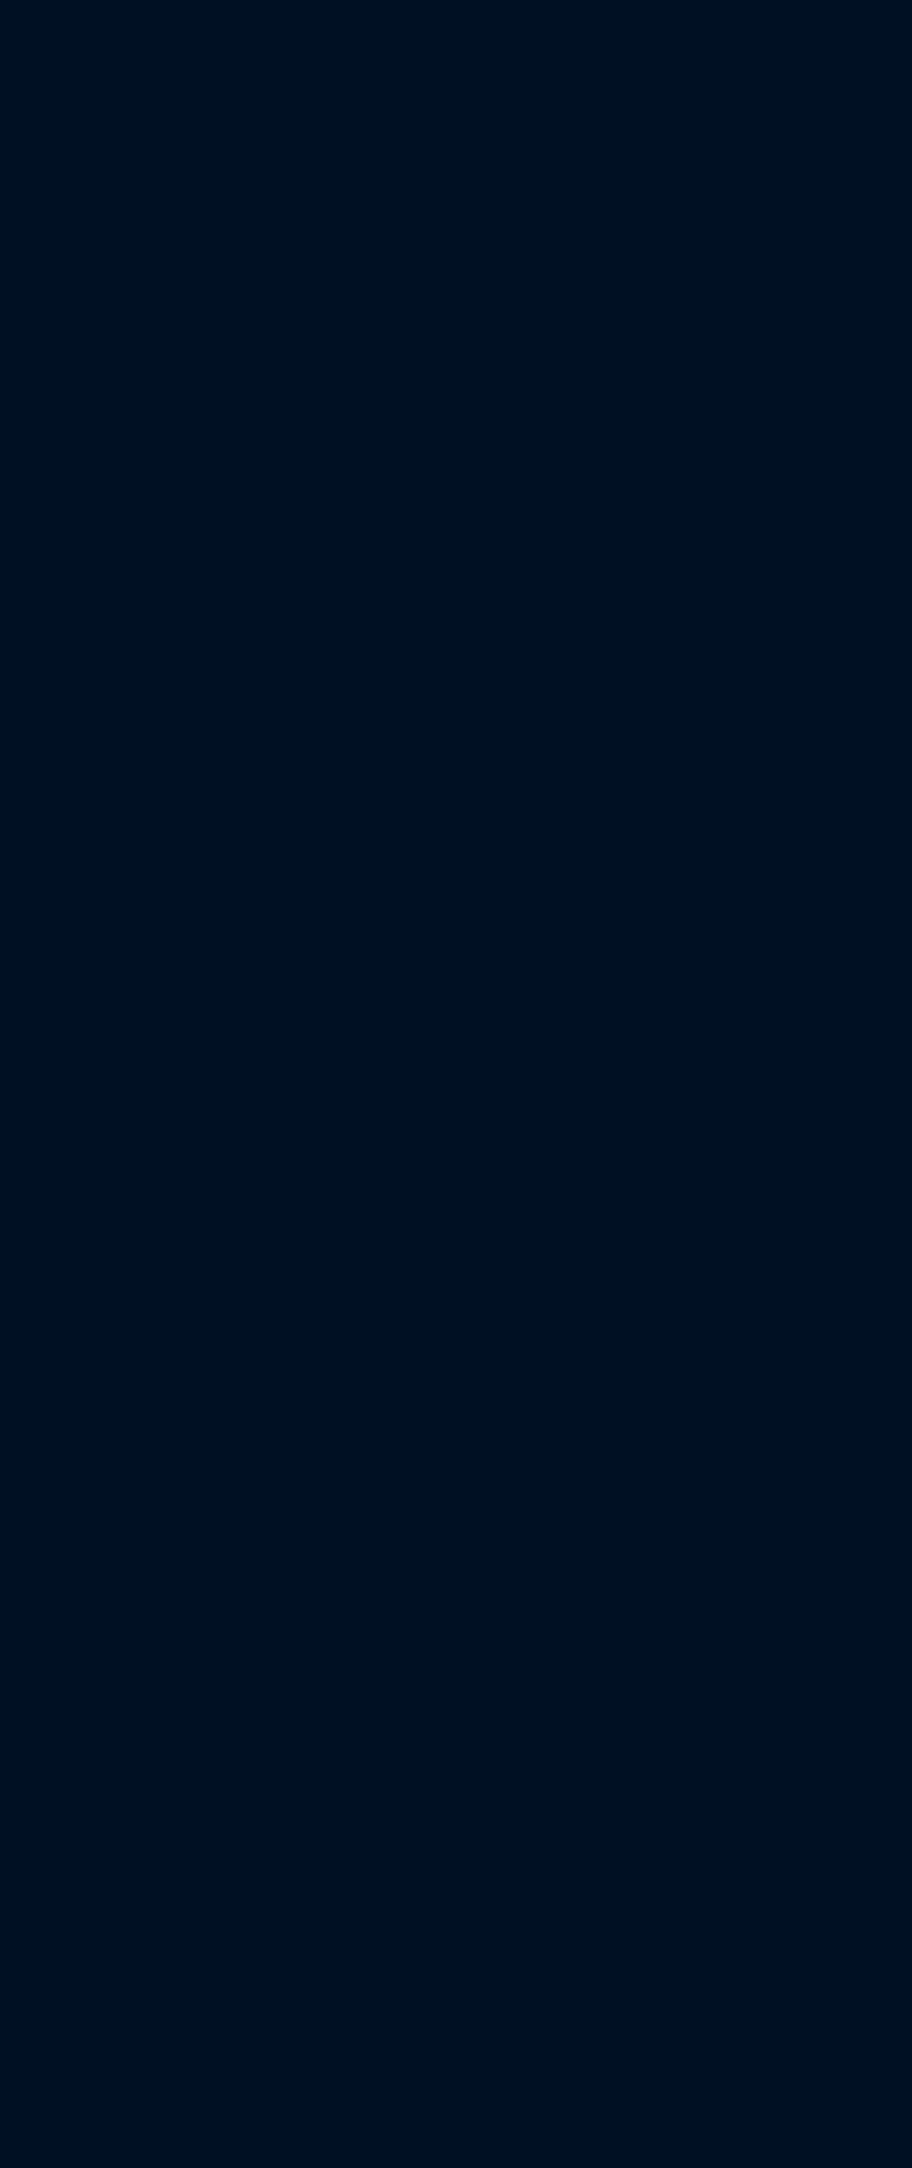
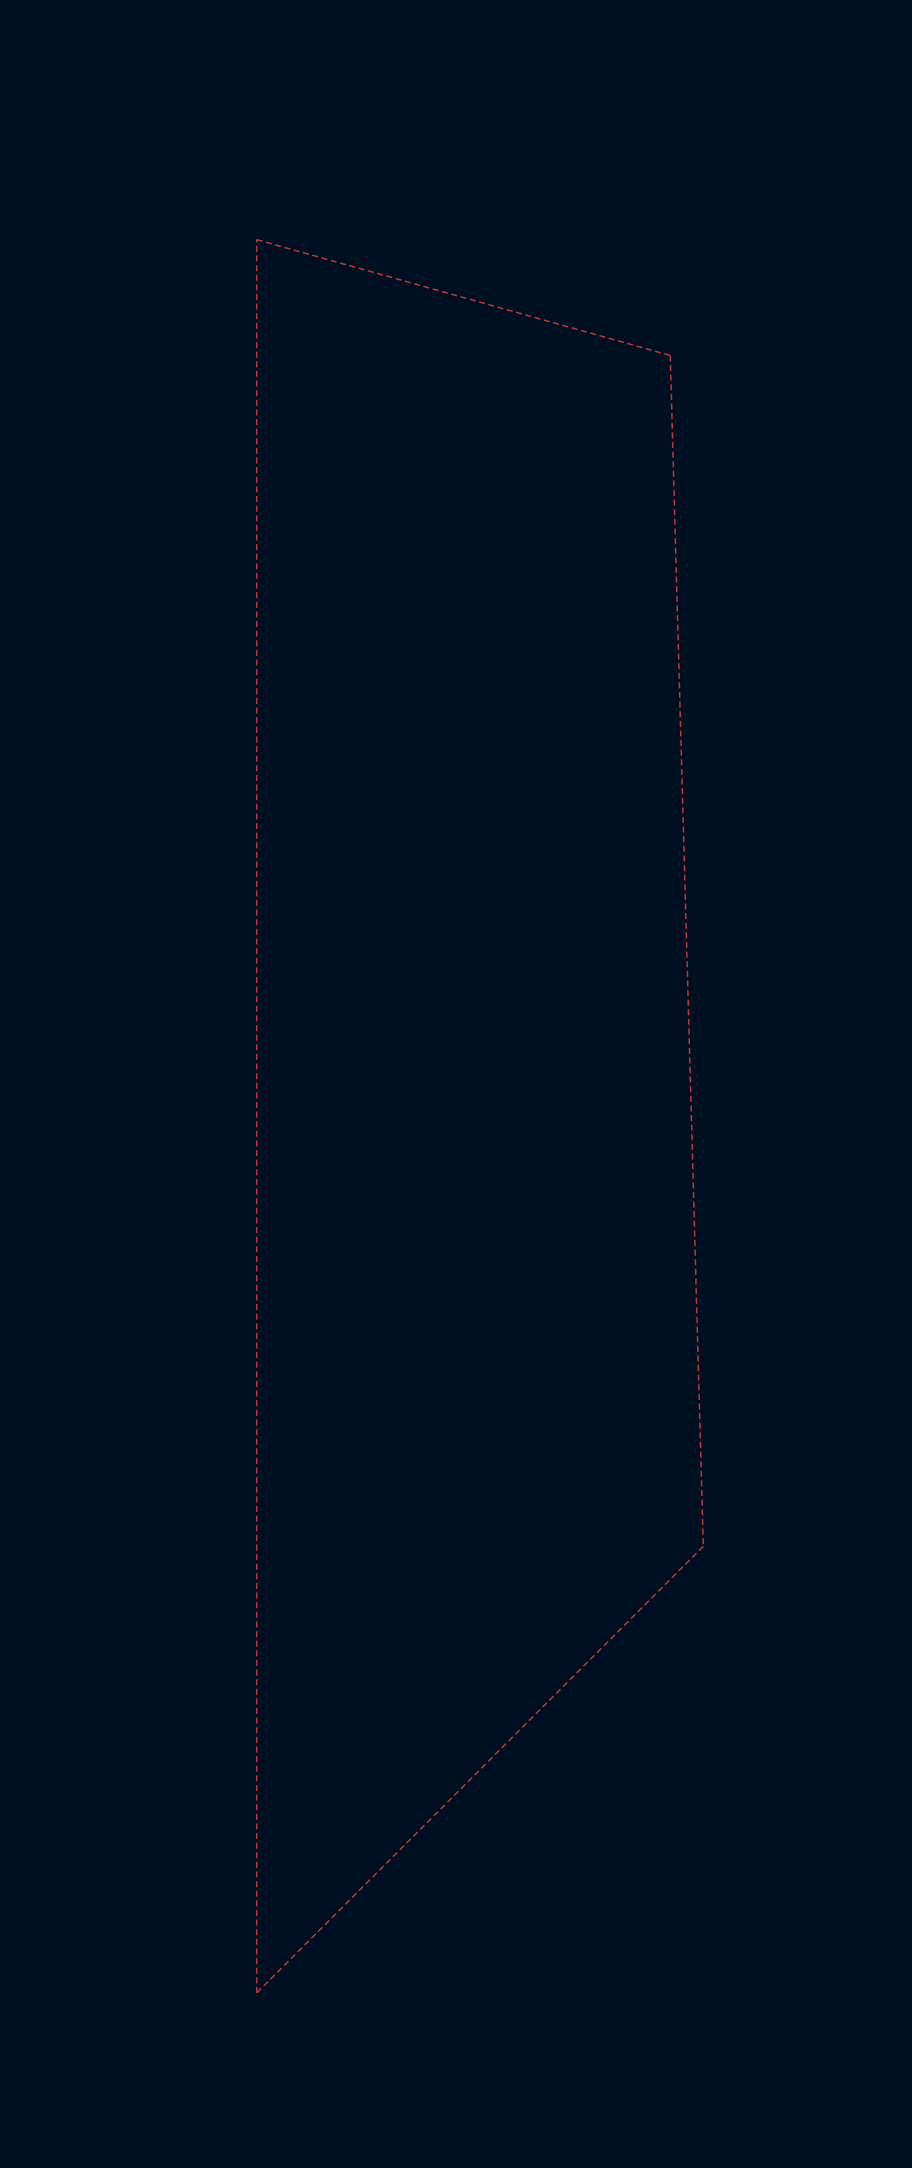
zone outline: none -> (256, 239) (256, 1992) (703, 1546) (670, 355) (256, 239)

